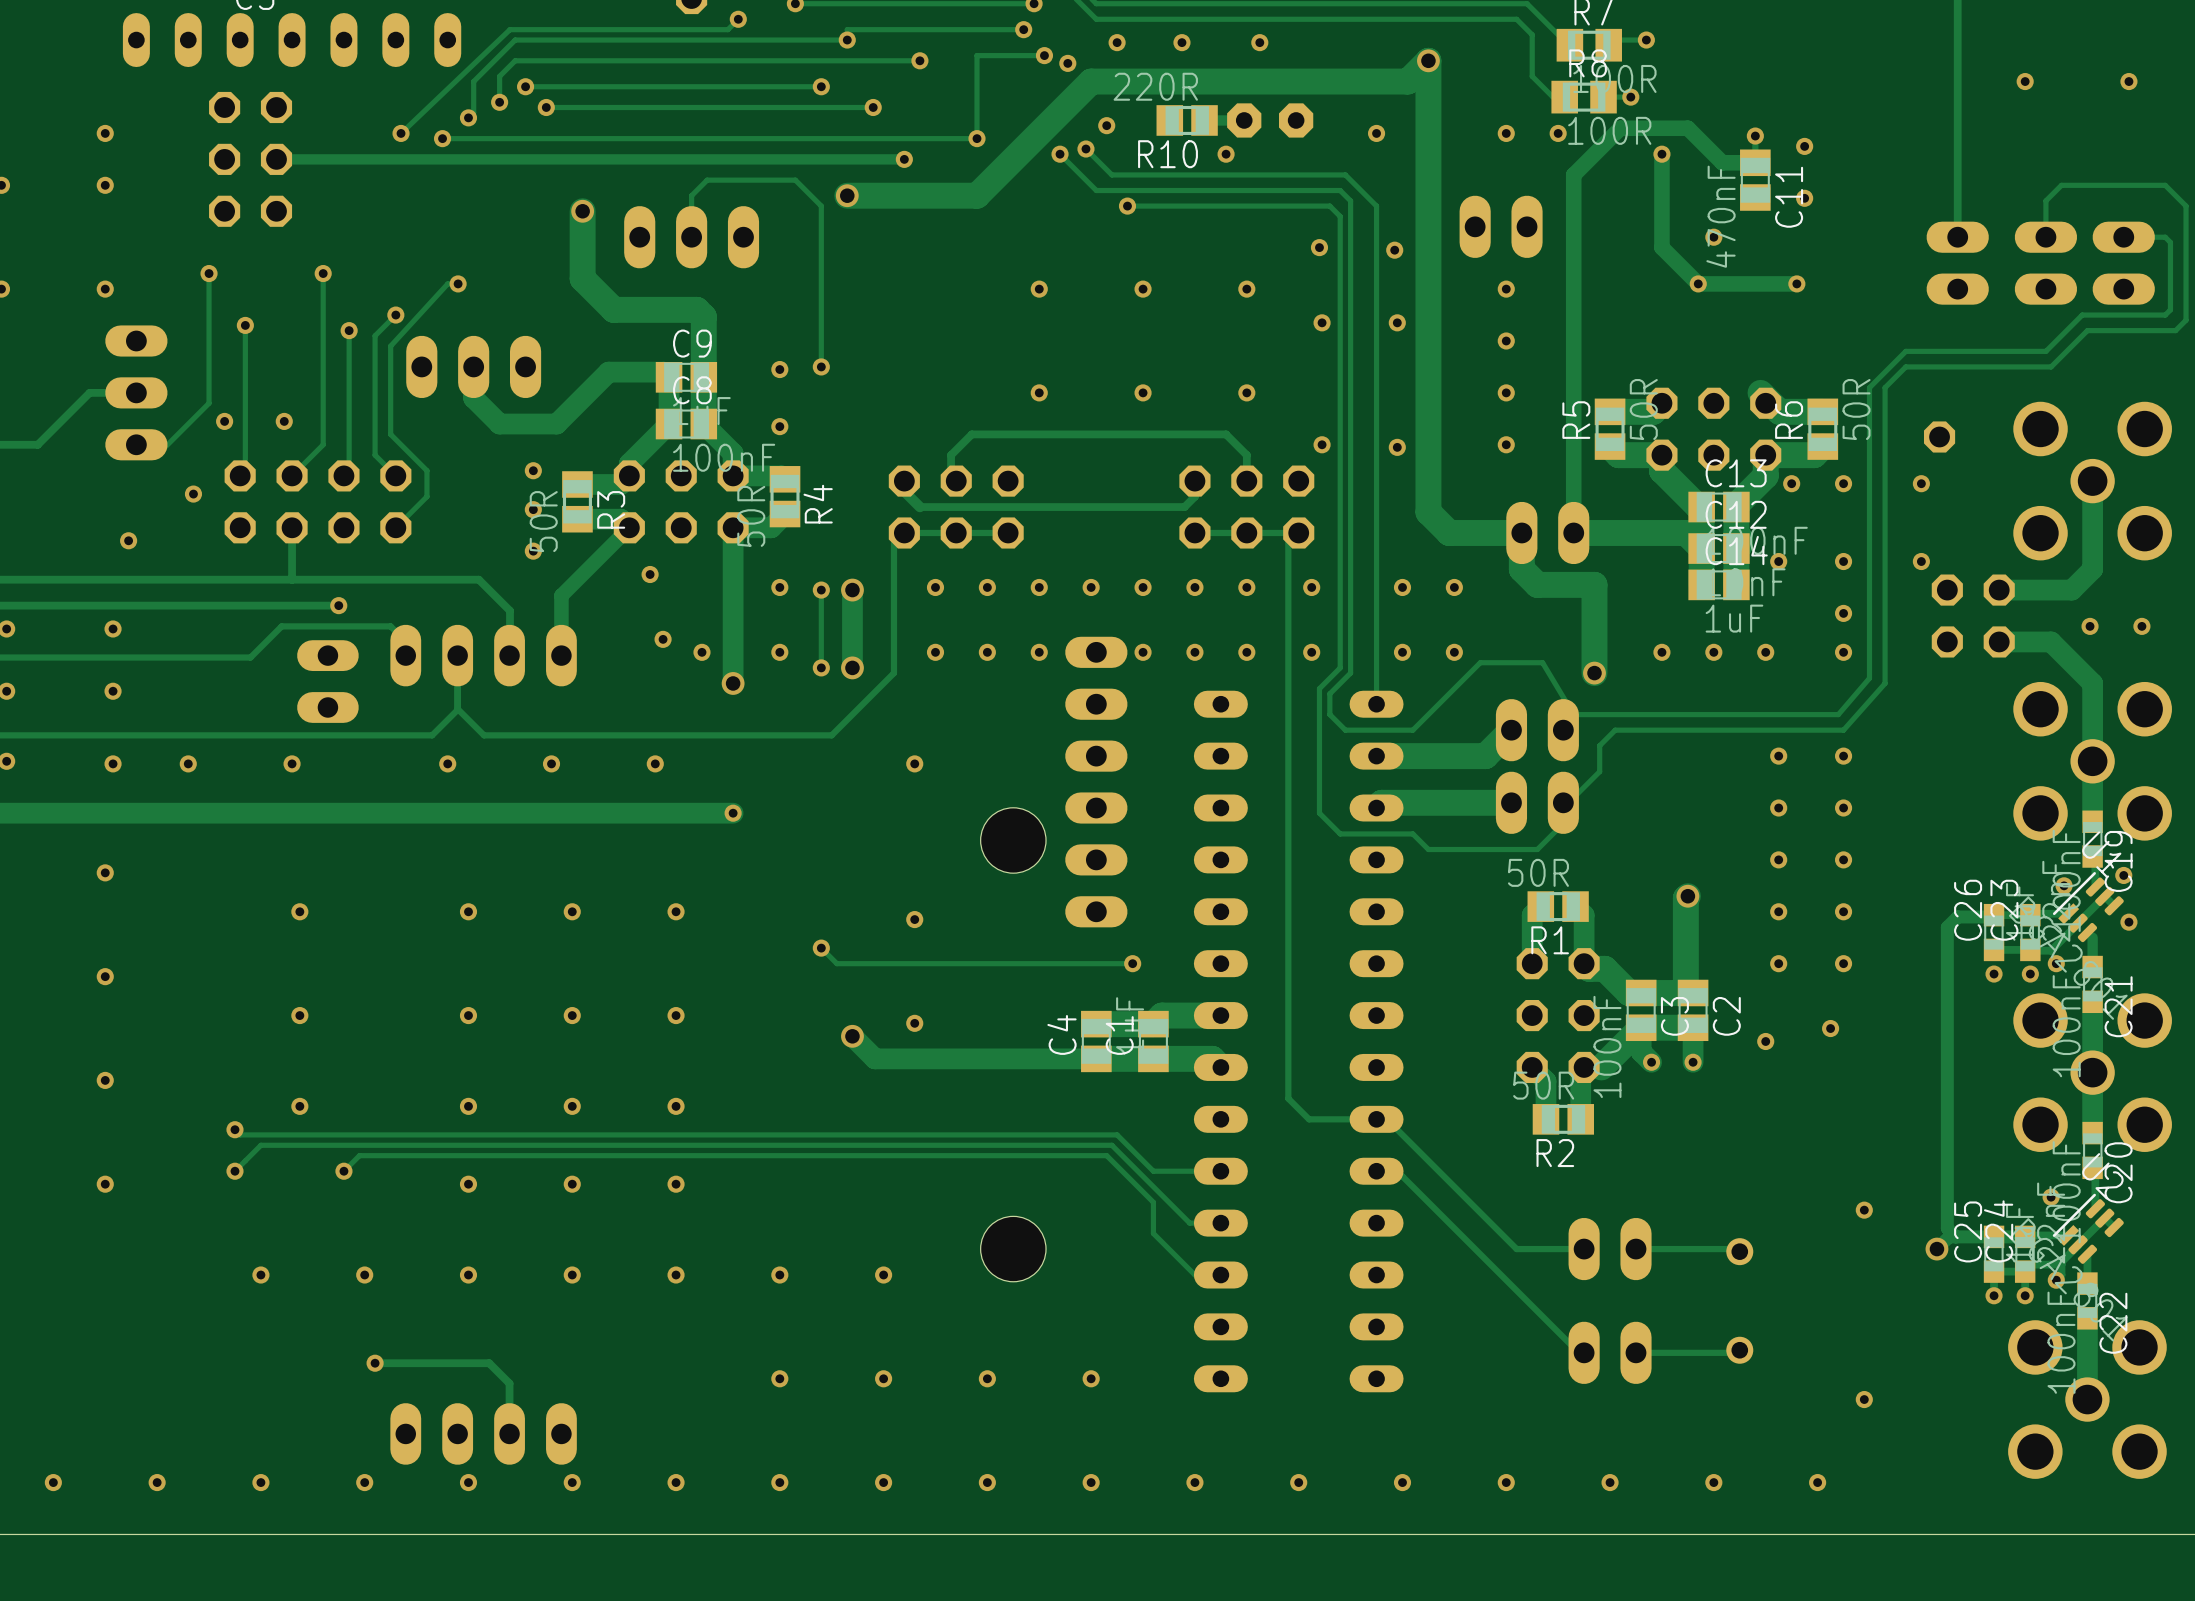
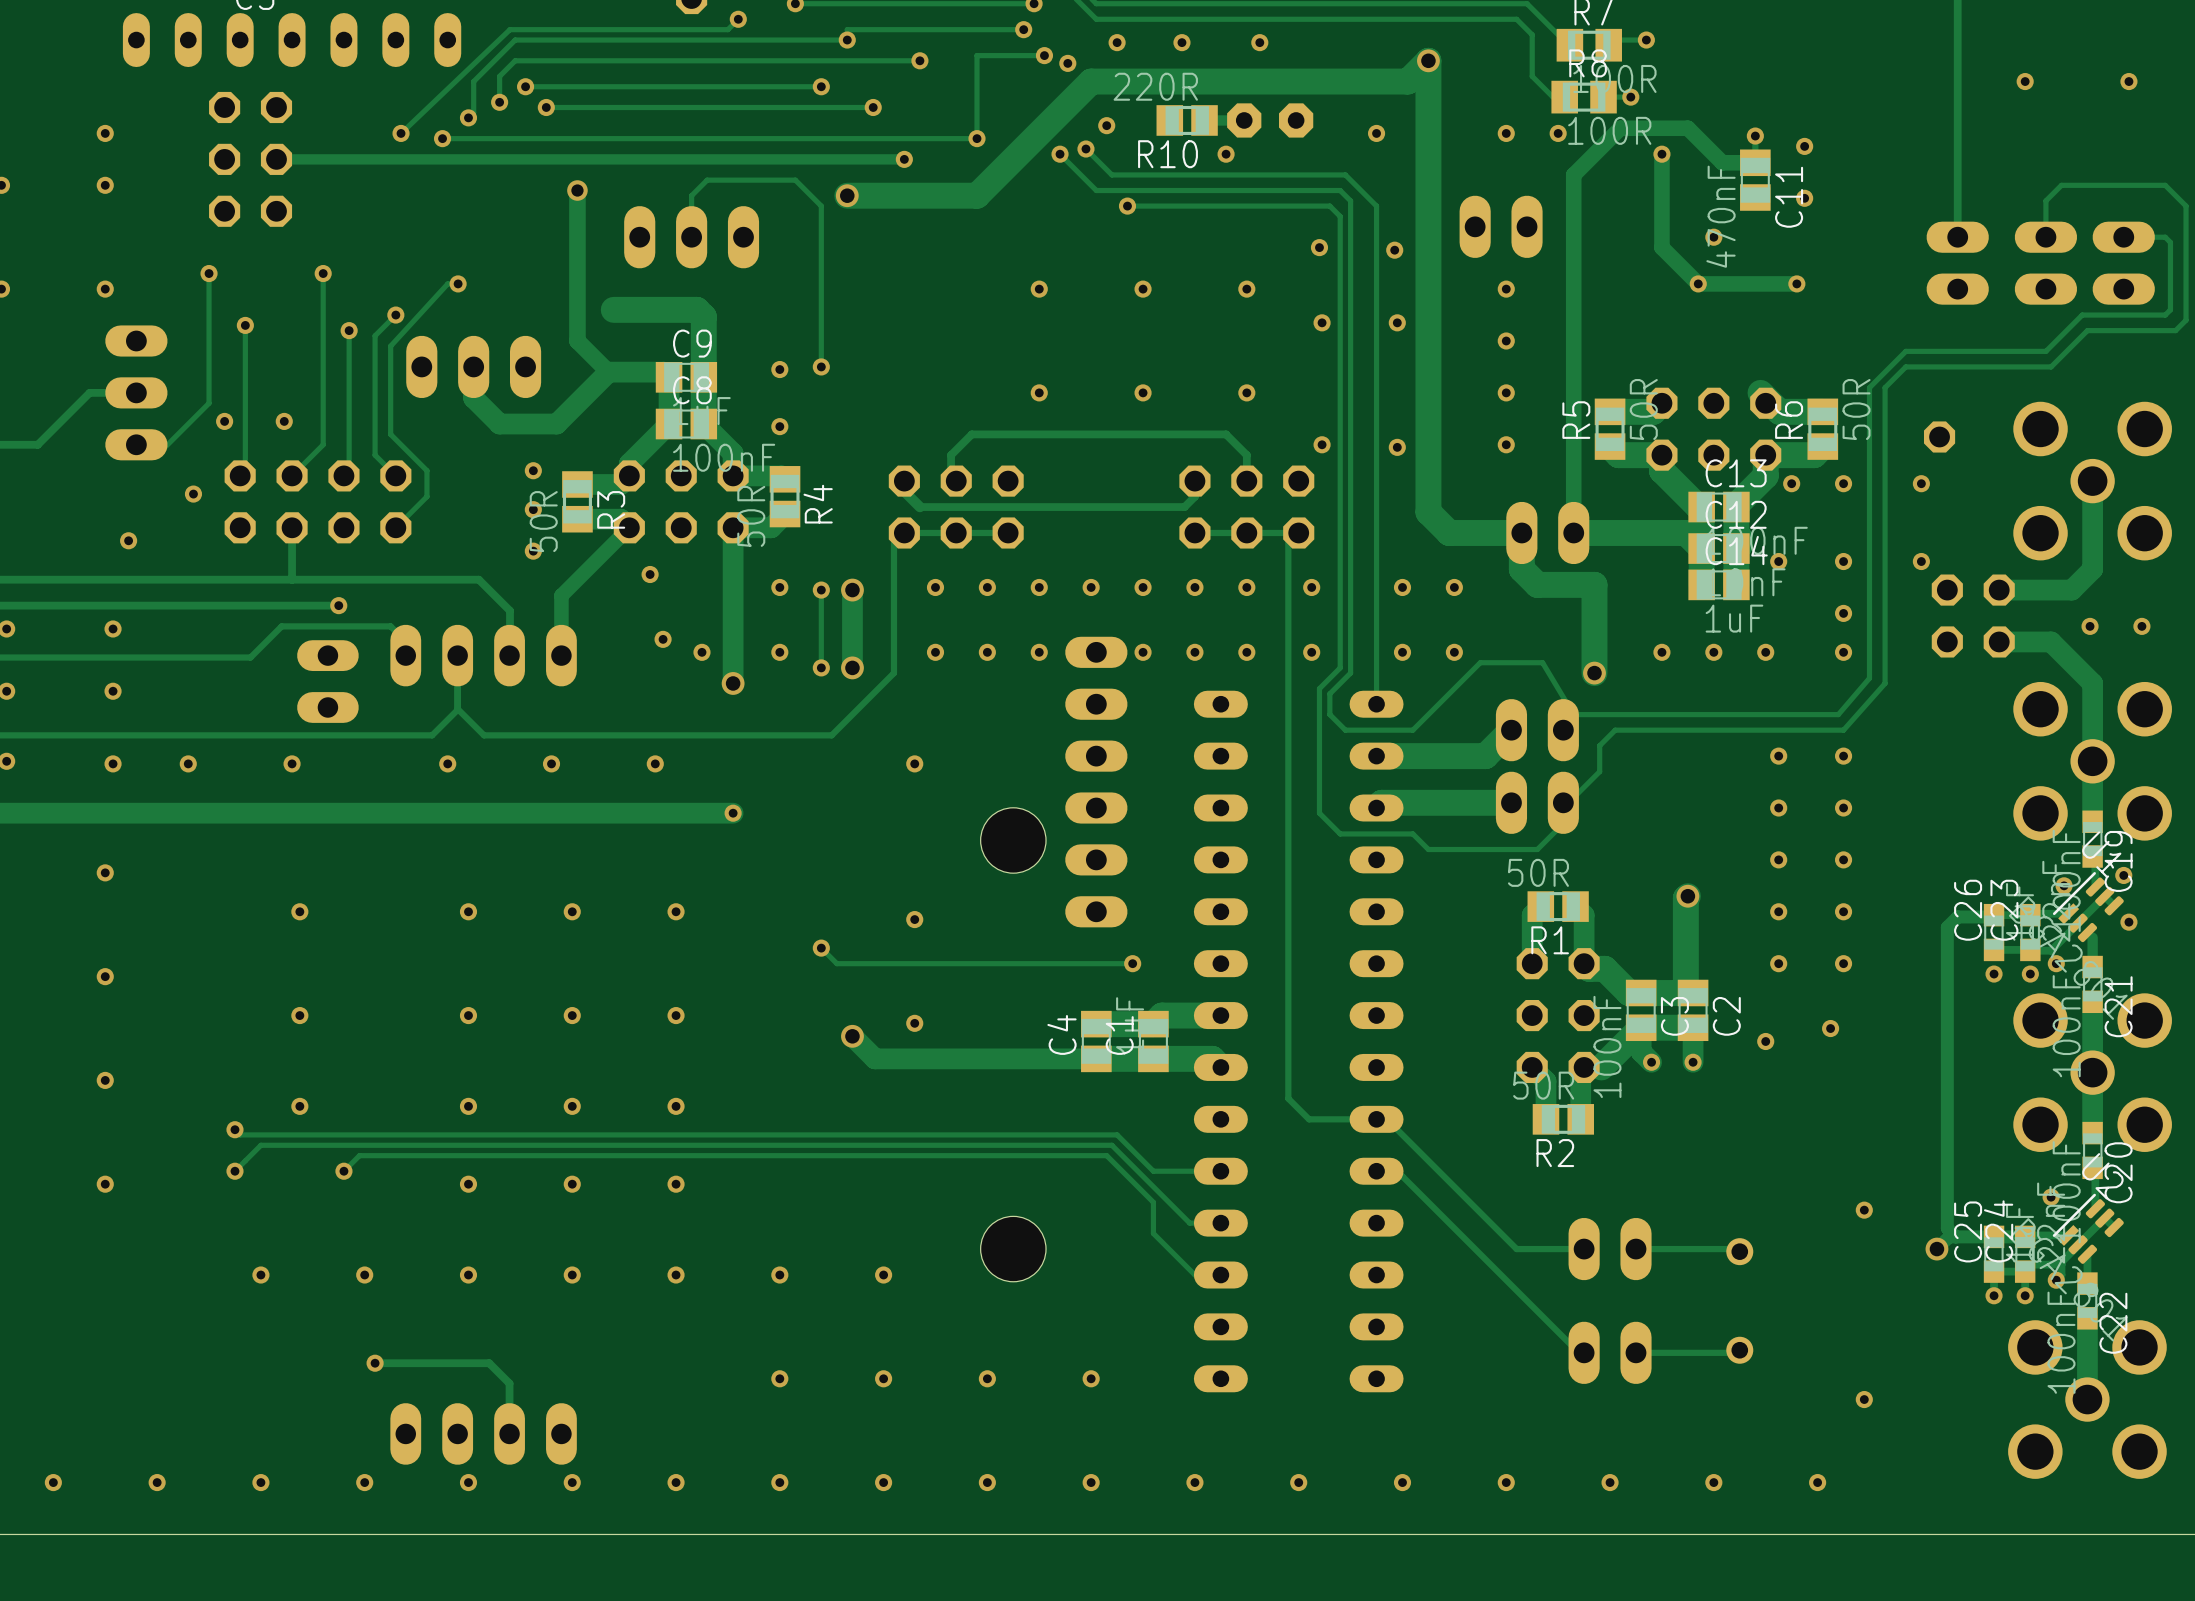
track: none -> (577, 190) (577, 341) (608, 372)
via: none -> (577, 190)
track: (582, 211) (582, 278) (613, 309) -> none
via: (582, 211) -> none

